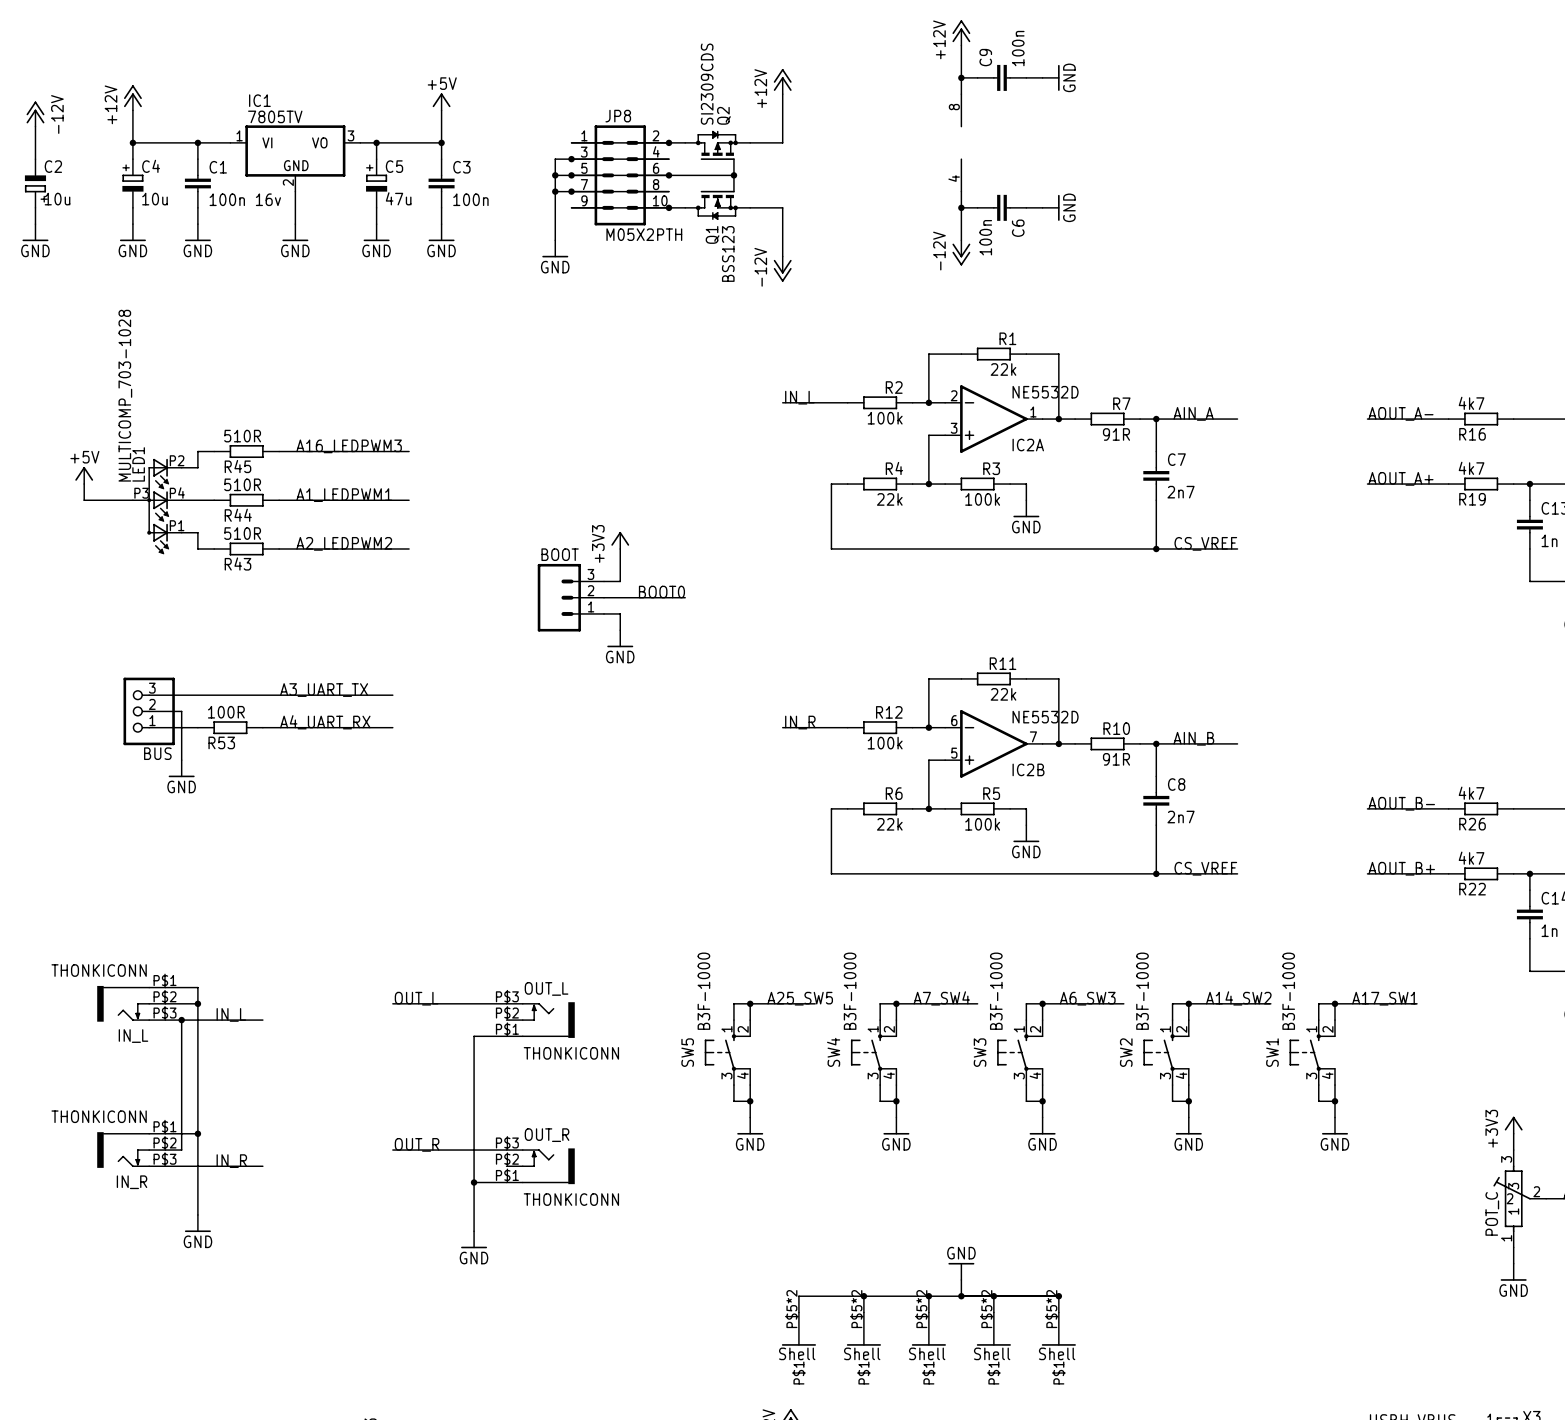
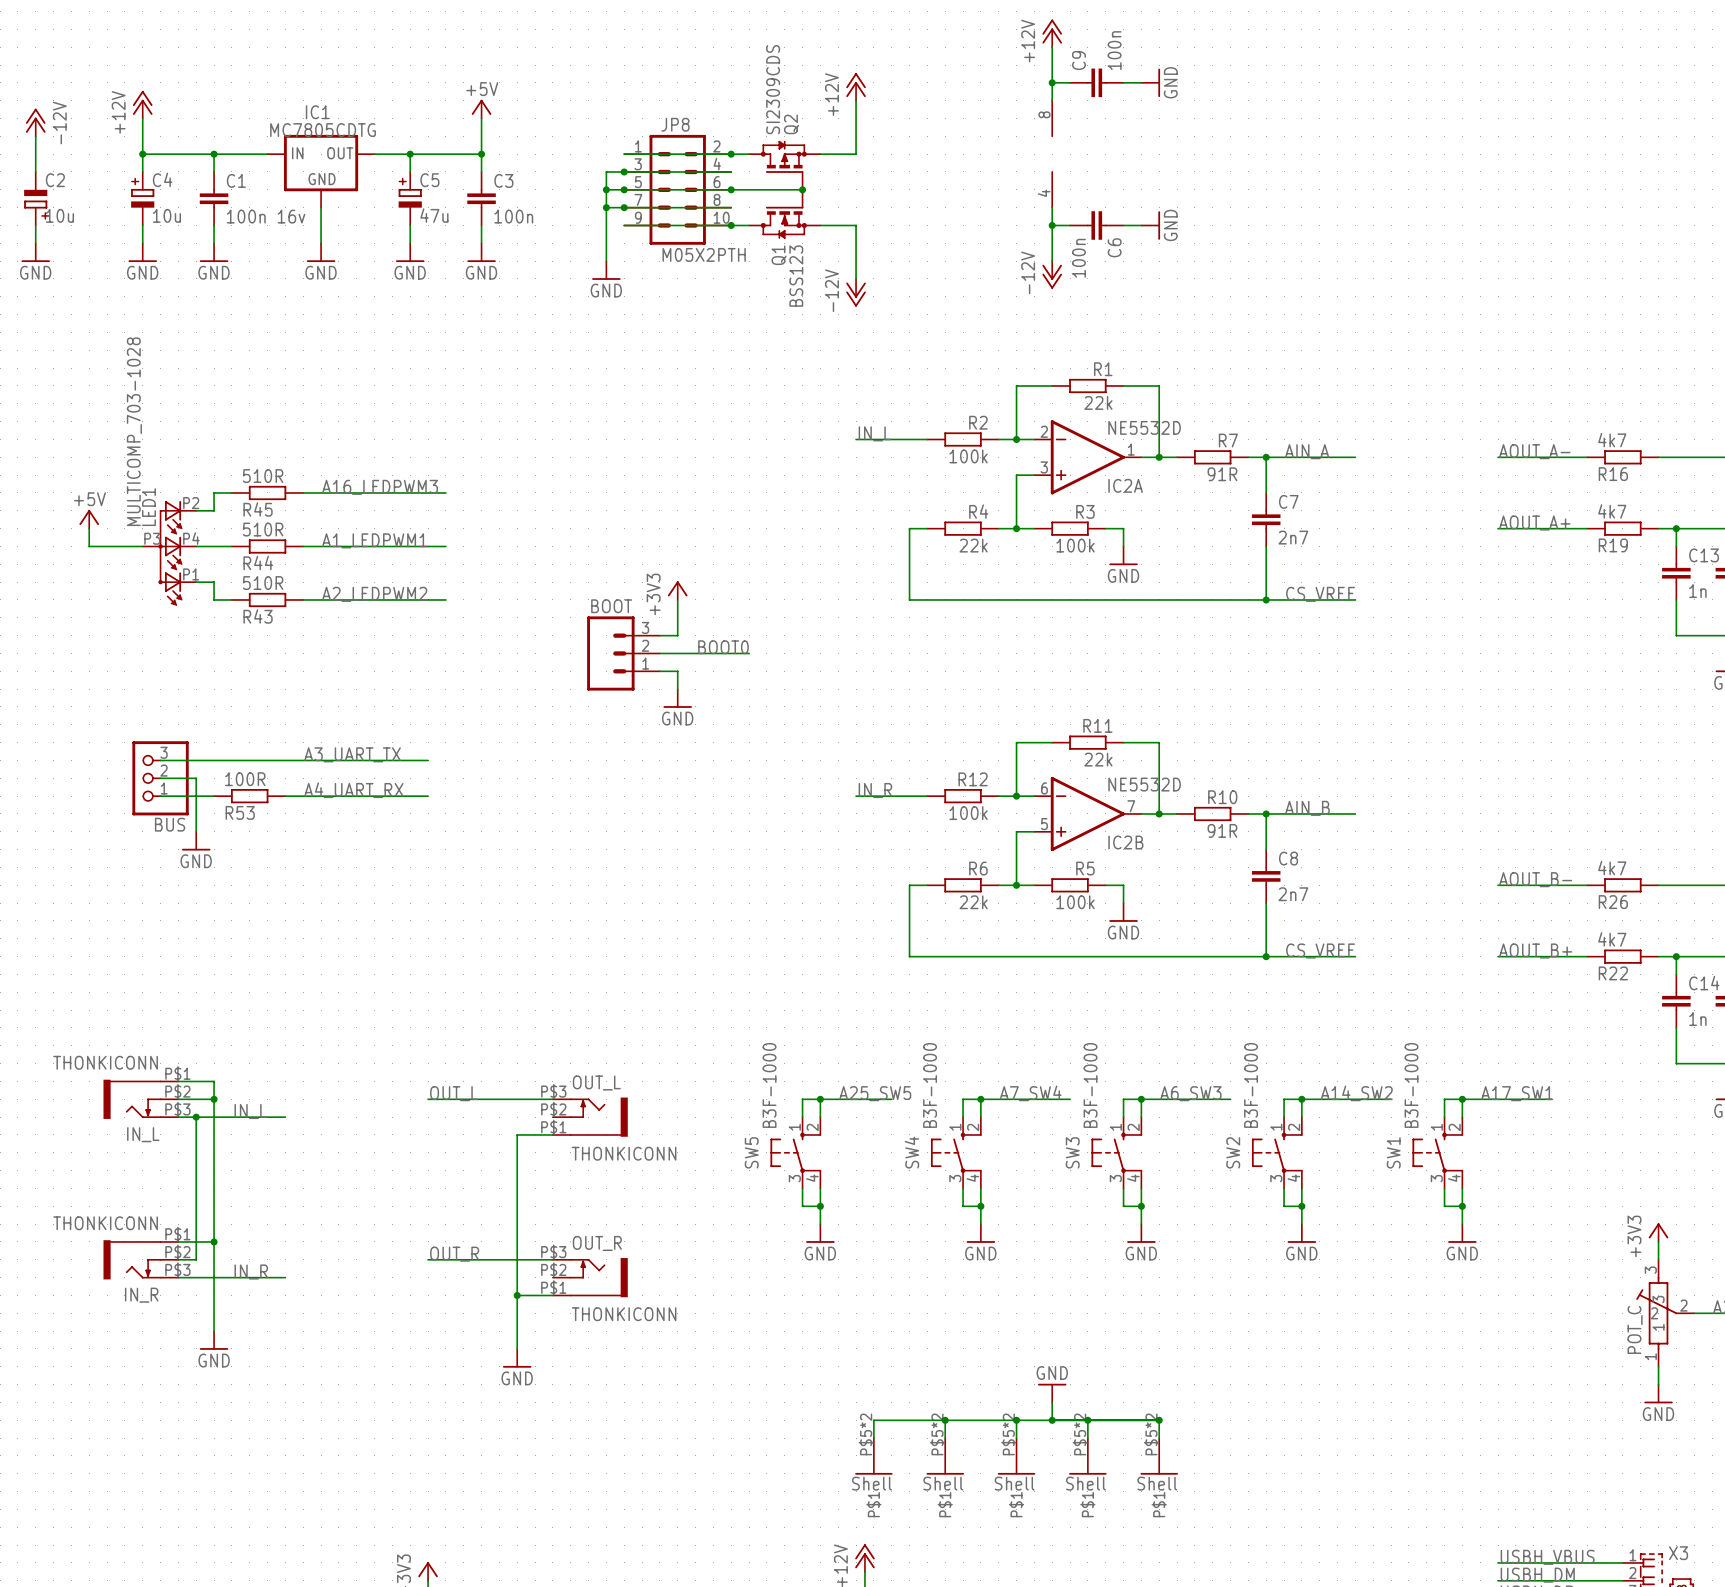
IC1 name position: IC1 (259, 100) -> IC1 (317, 112)
IC1 value: 7805TV (275, 116) -> MC7805CDTG (323, 130)
IC1 symbol: [230, 125, 361, 192] -> [267, 134, 375, 208]

